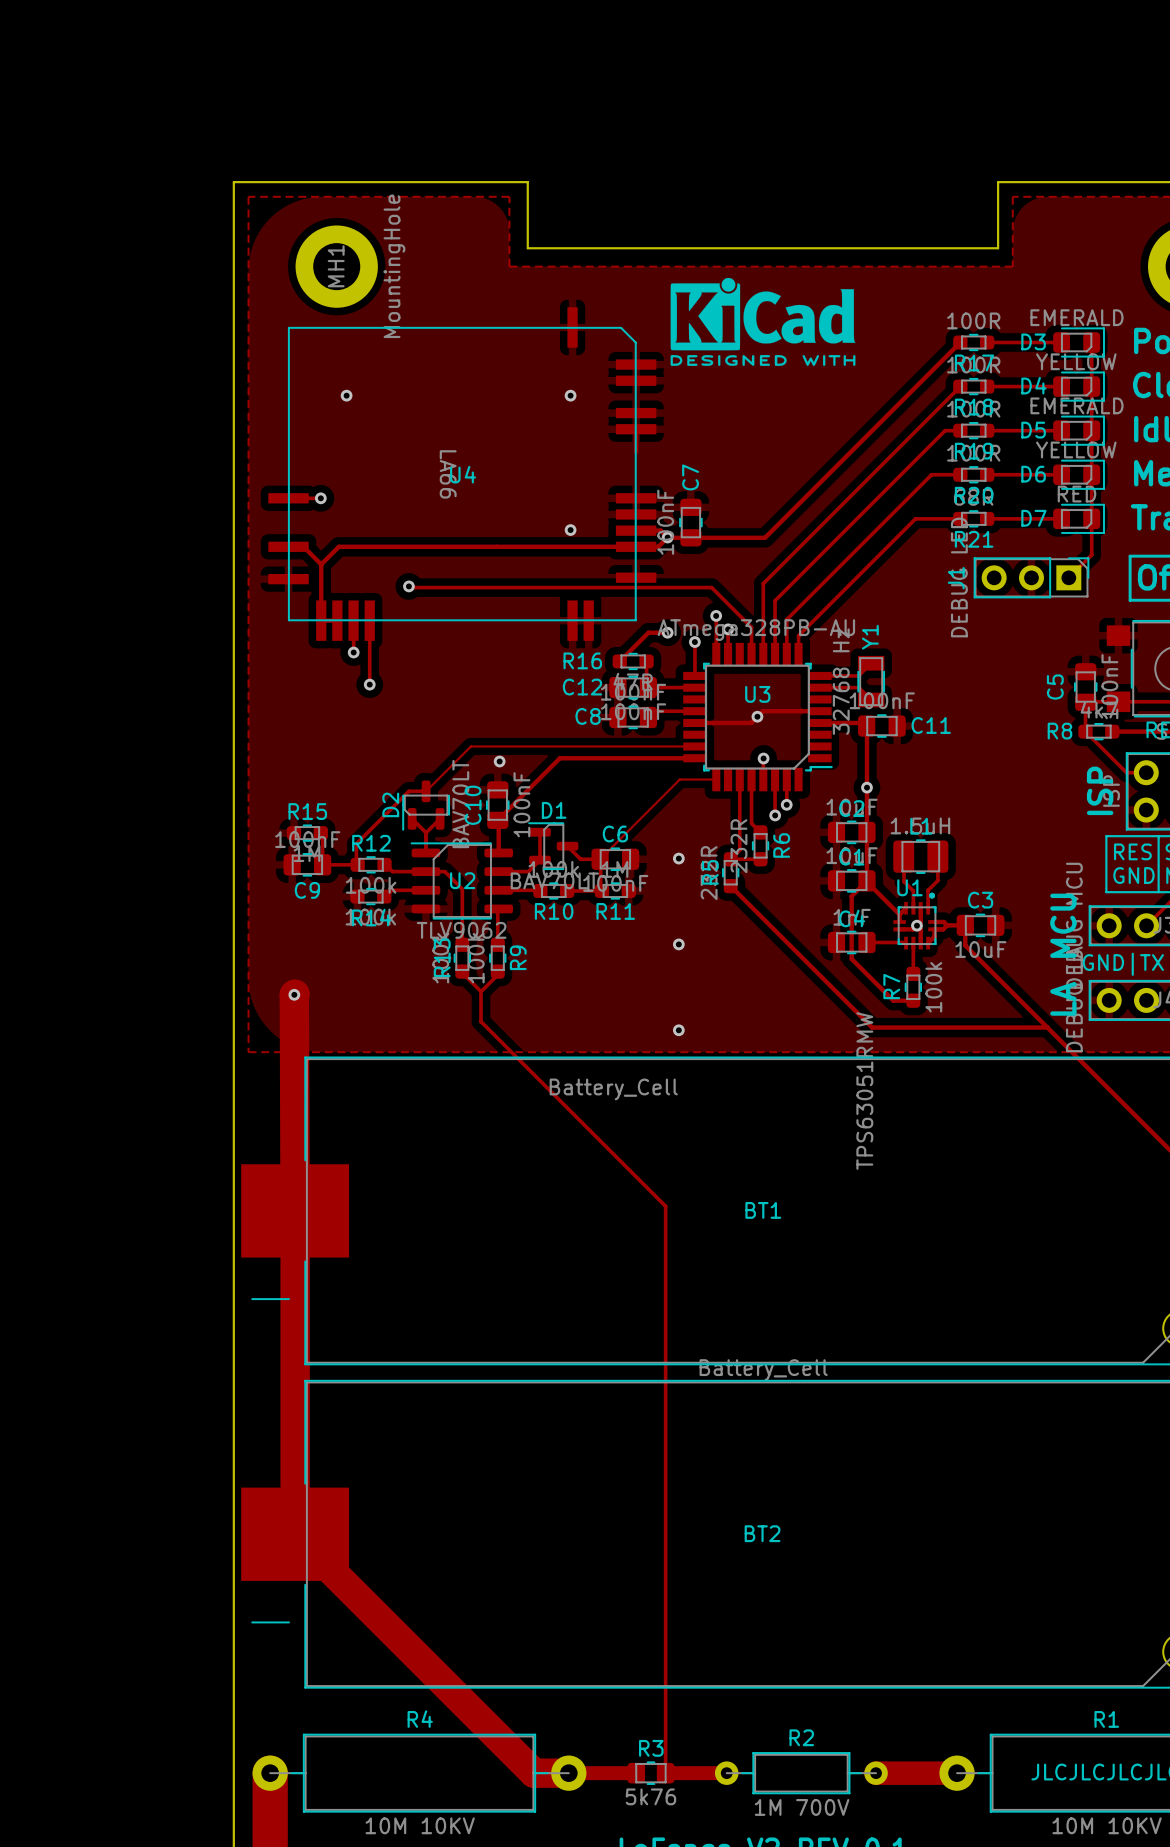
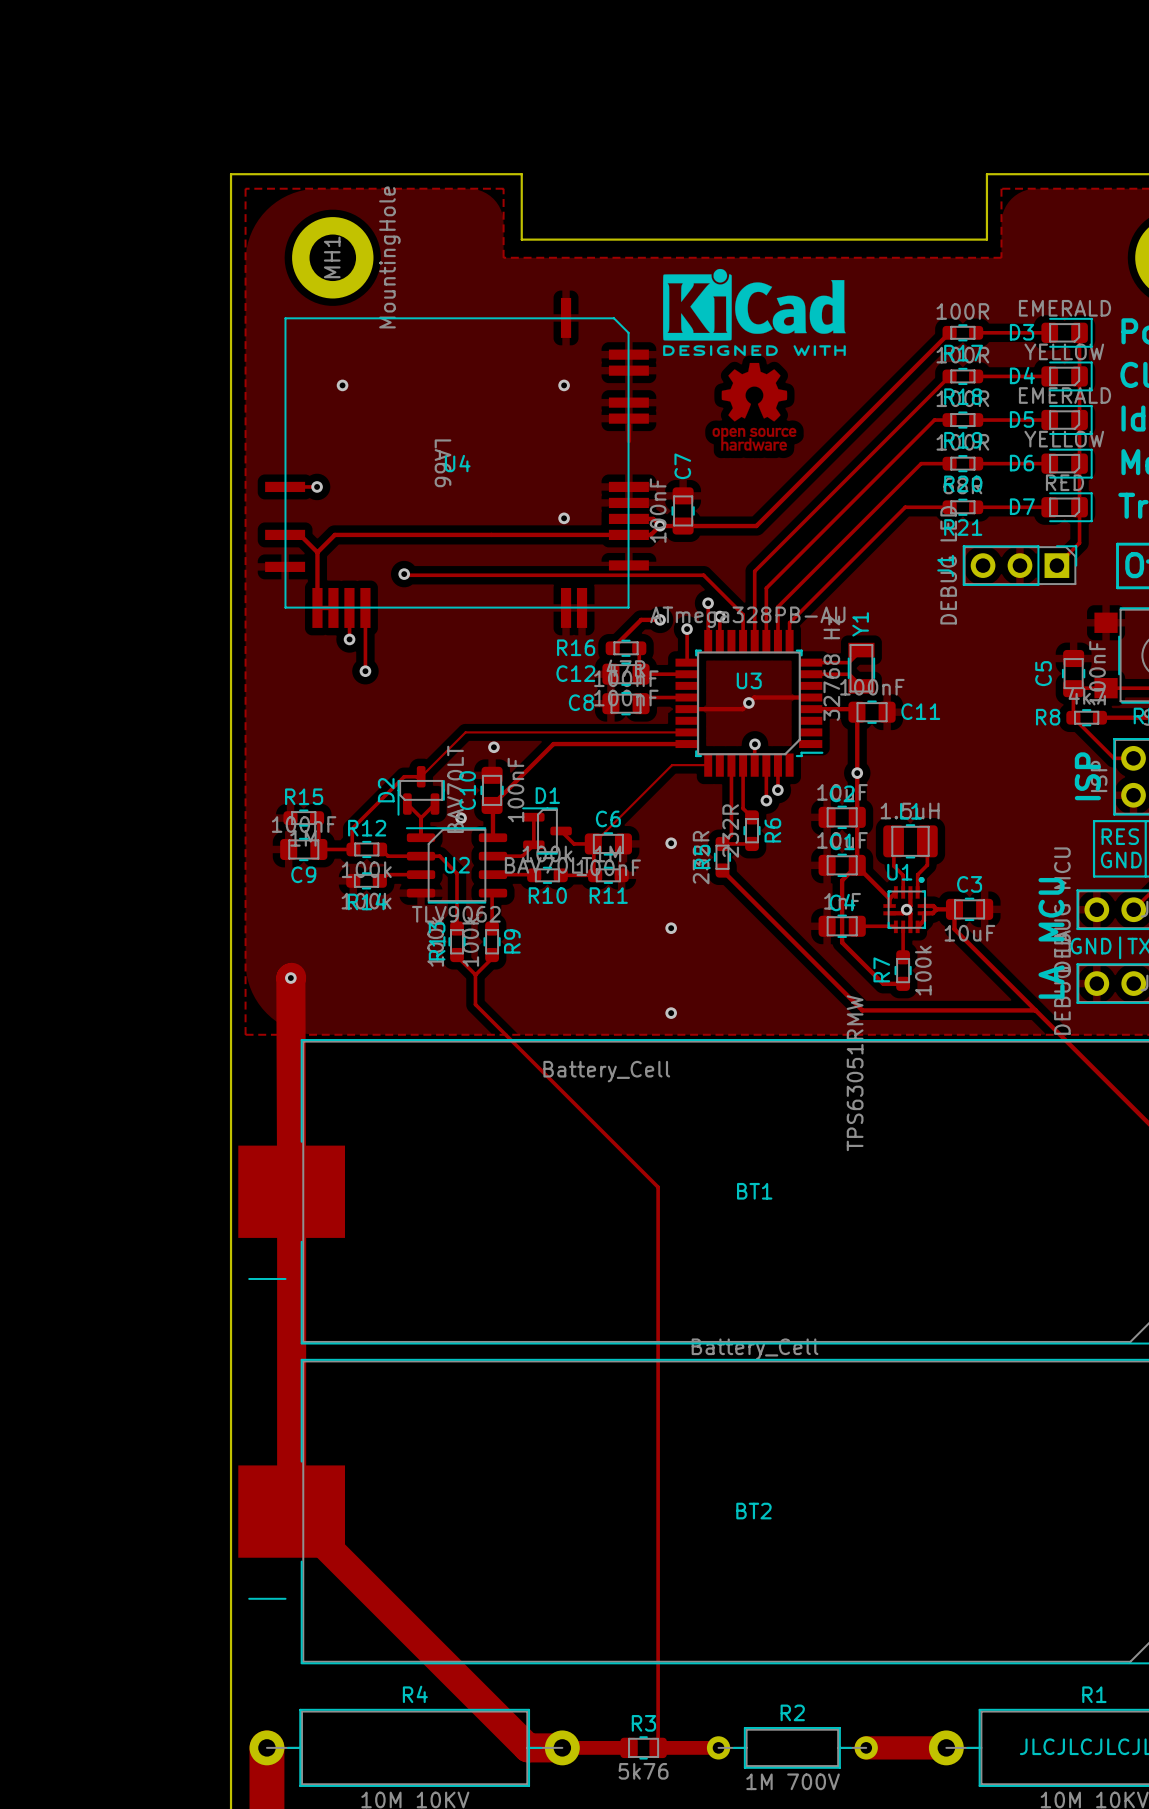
drawing: none -> [712, 362, 797, 451]
via: none -> (461, 818)

